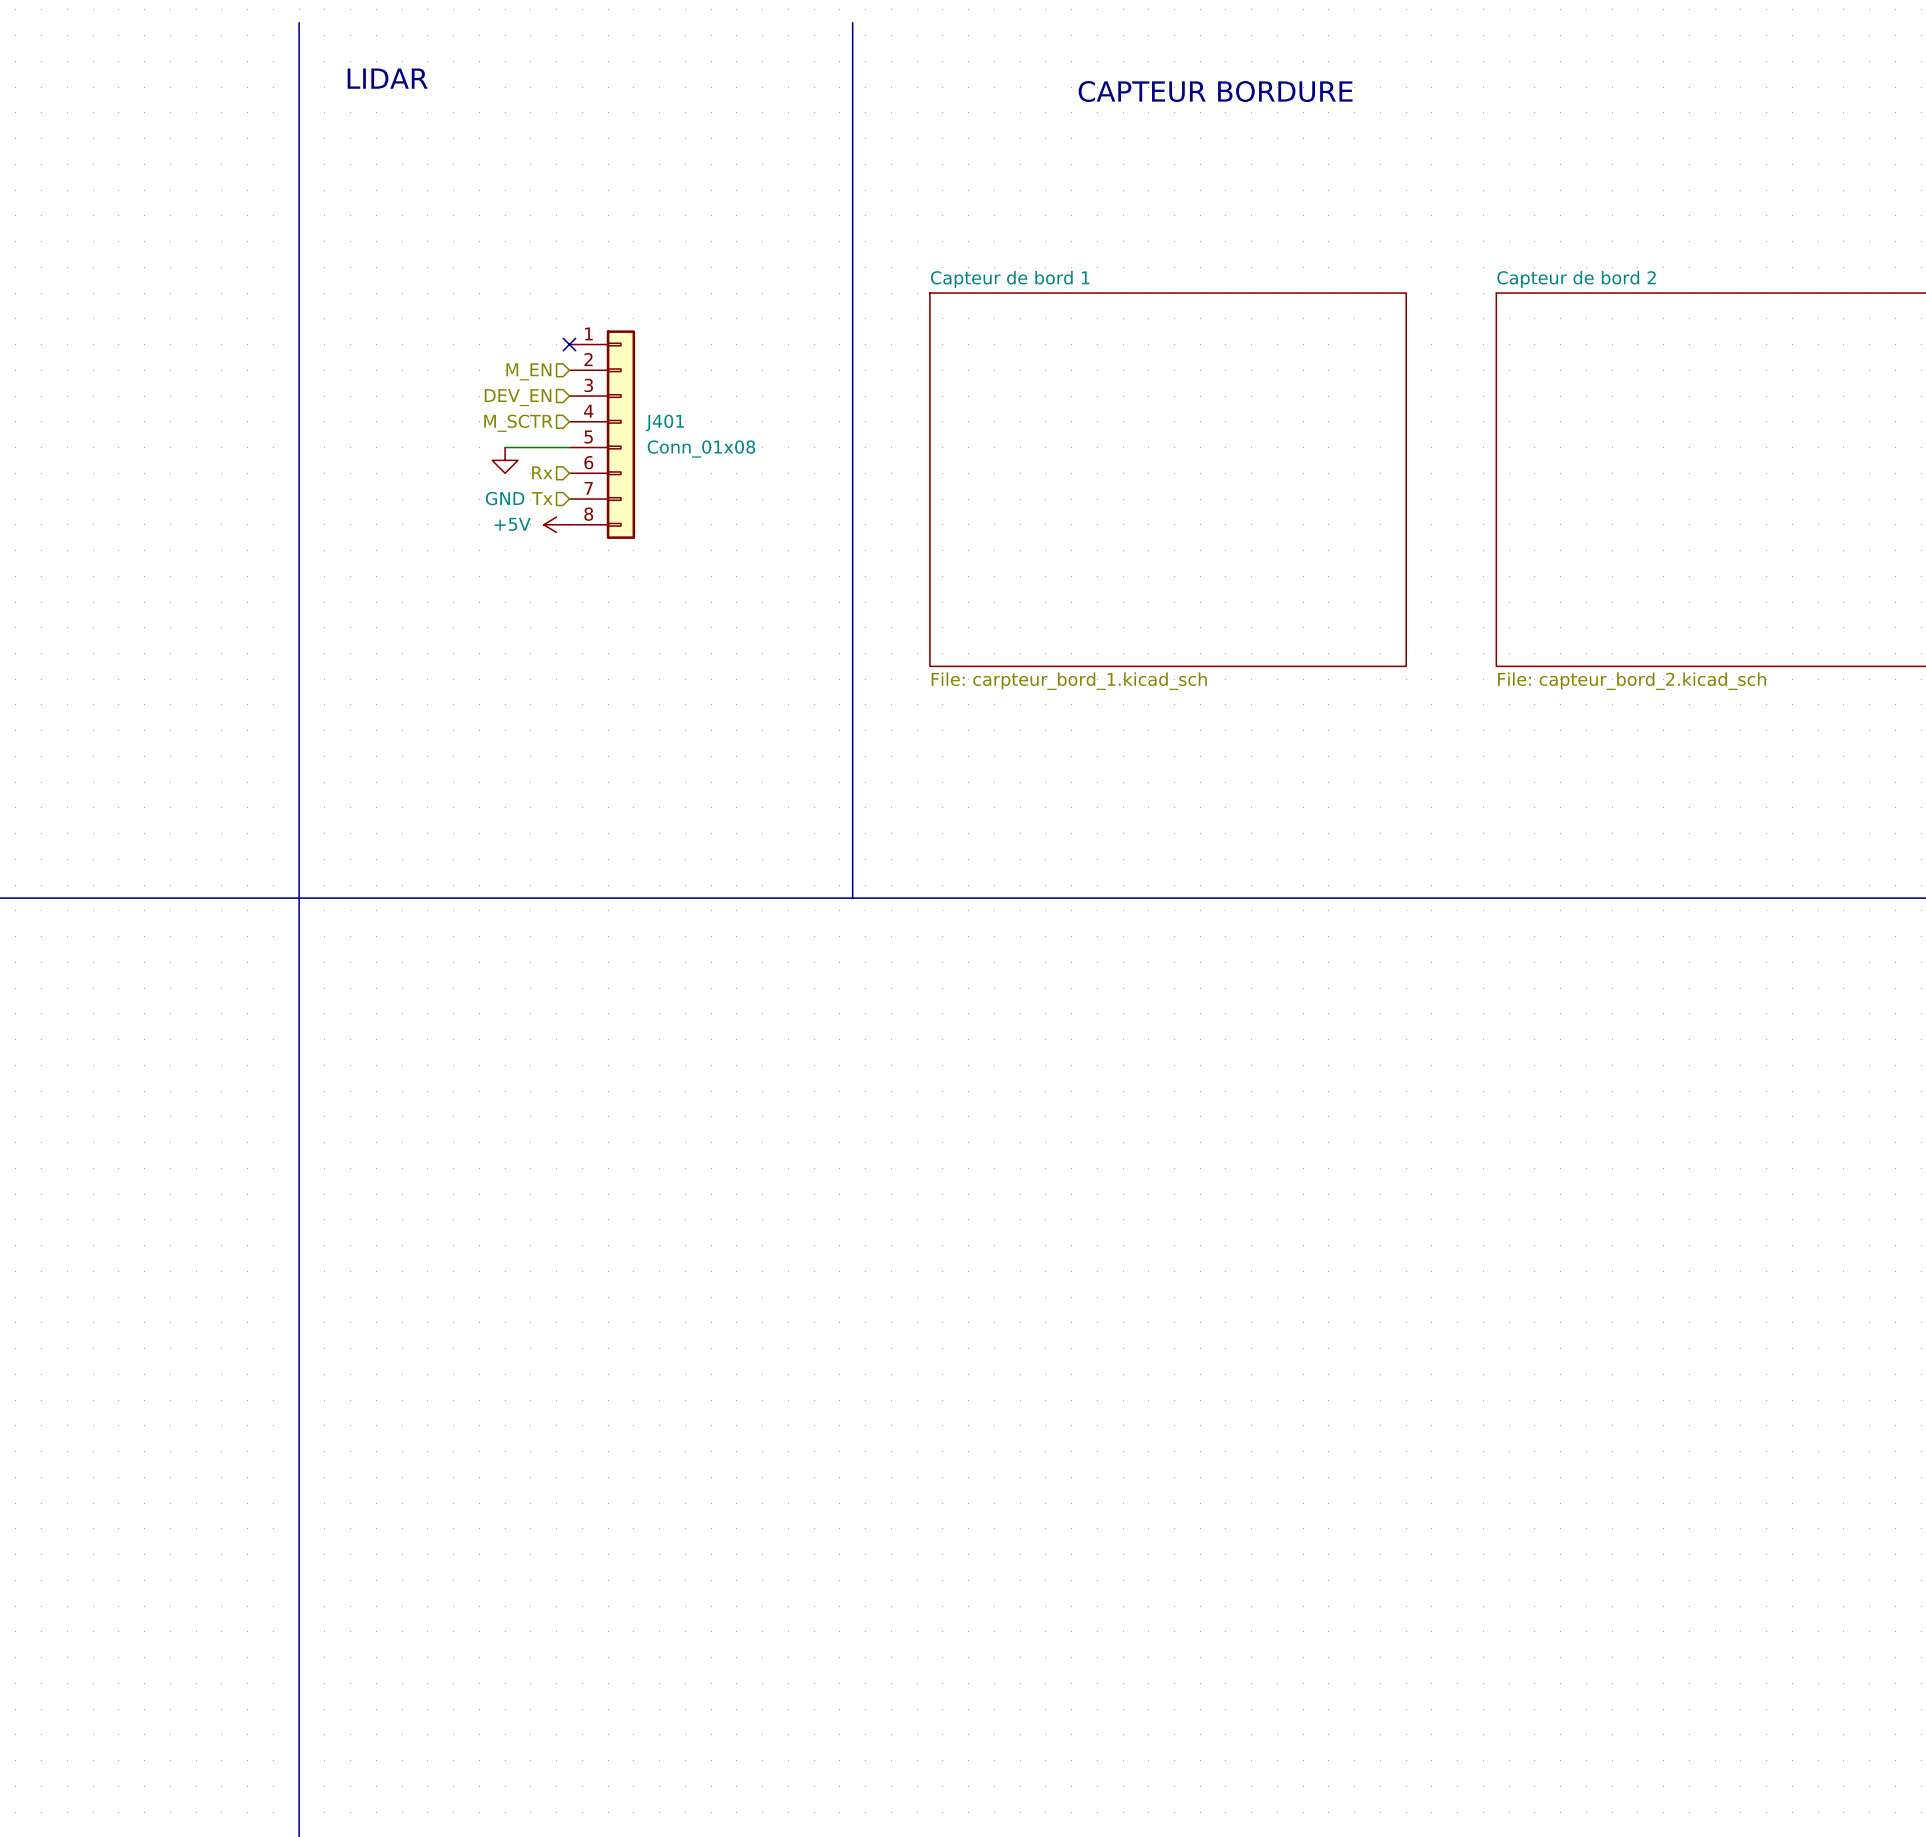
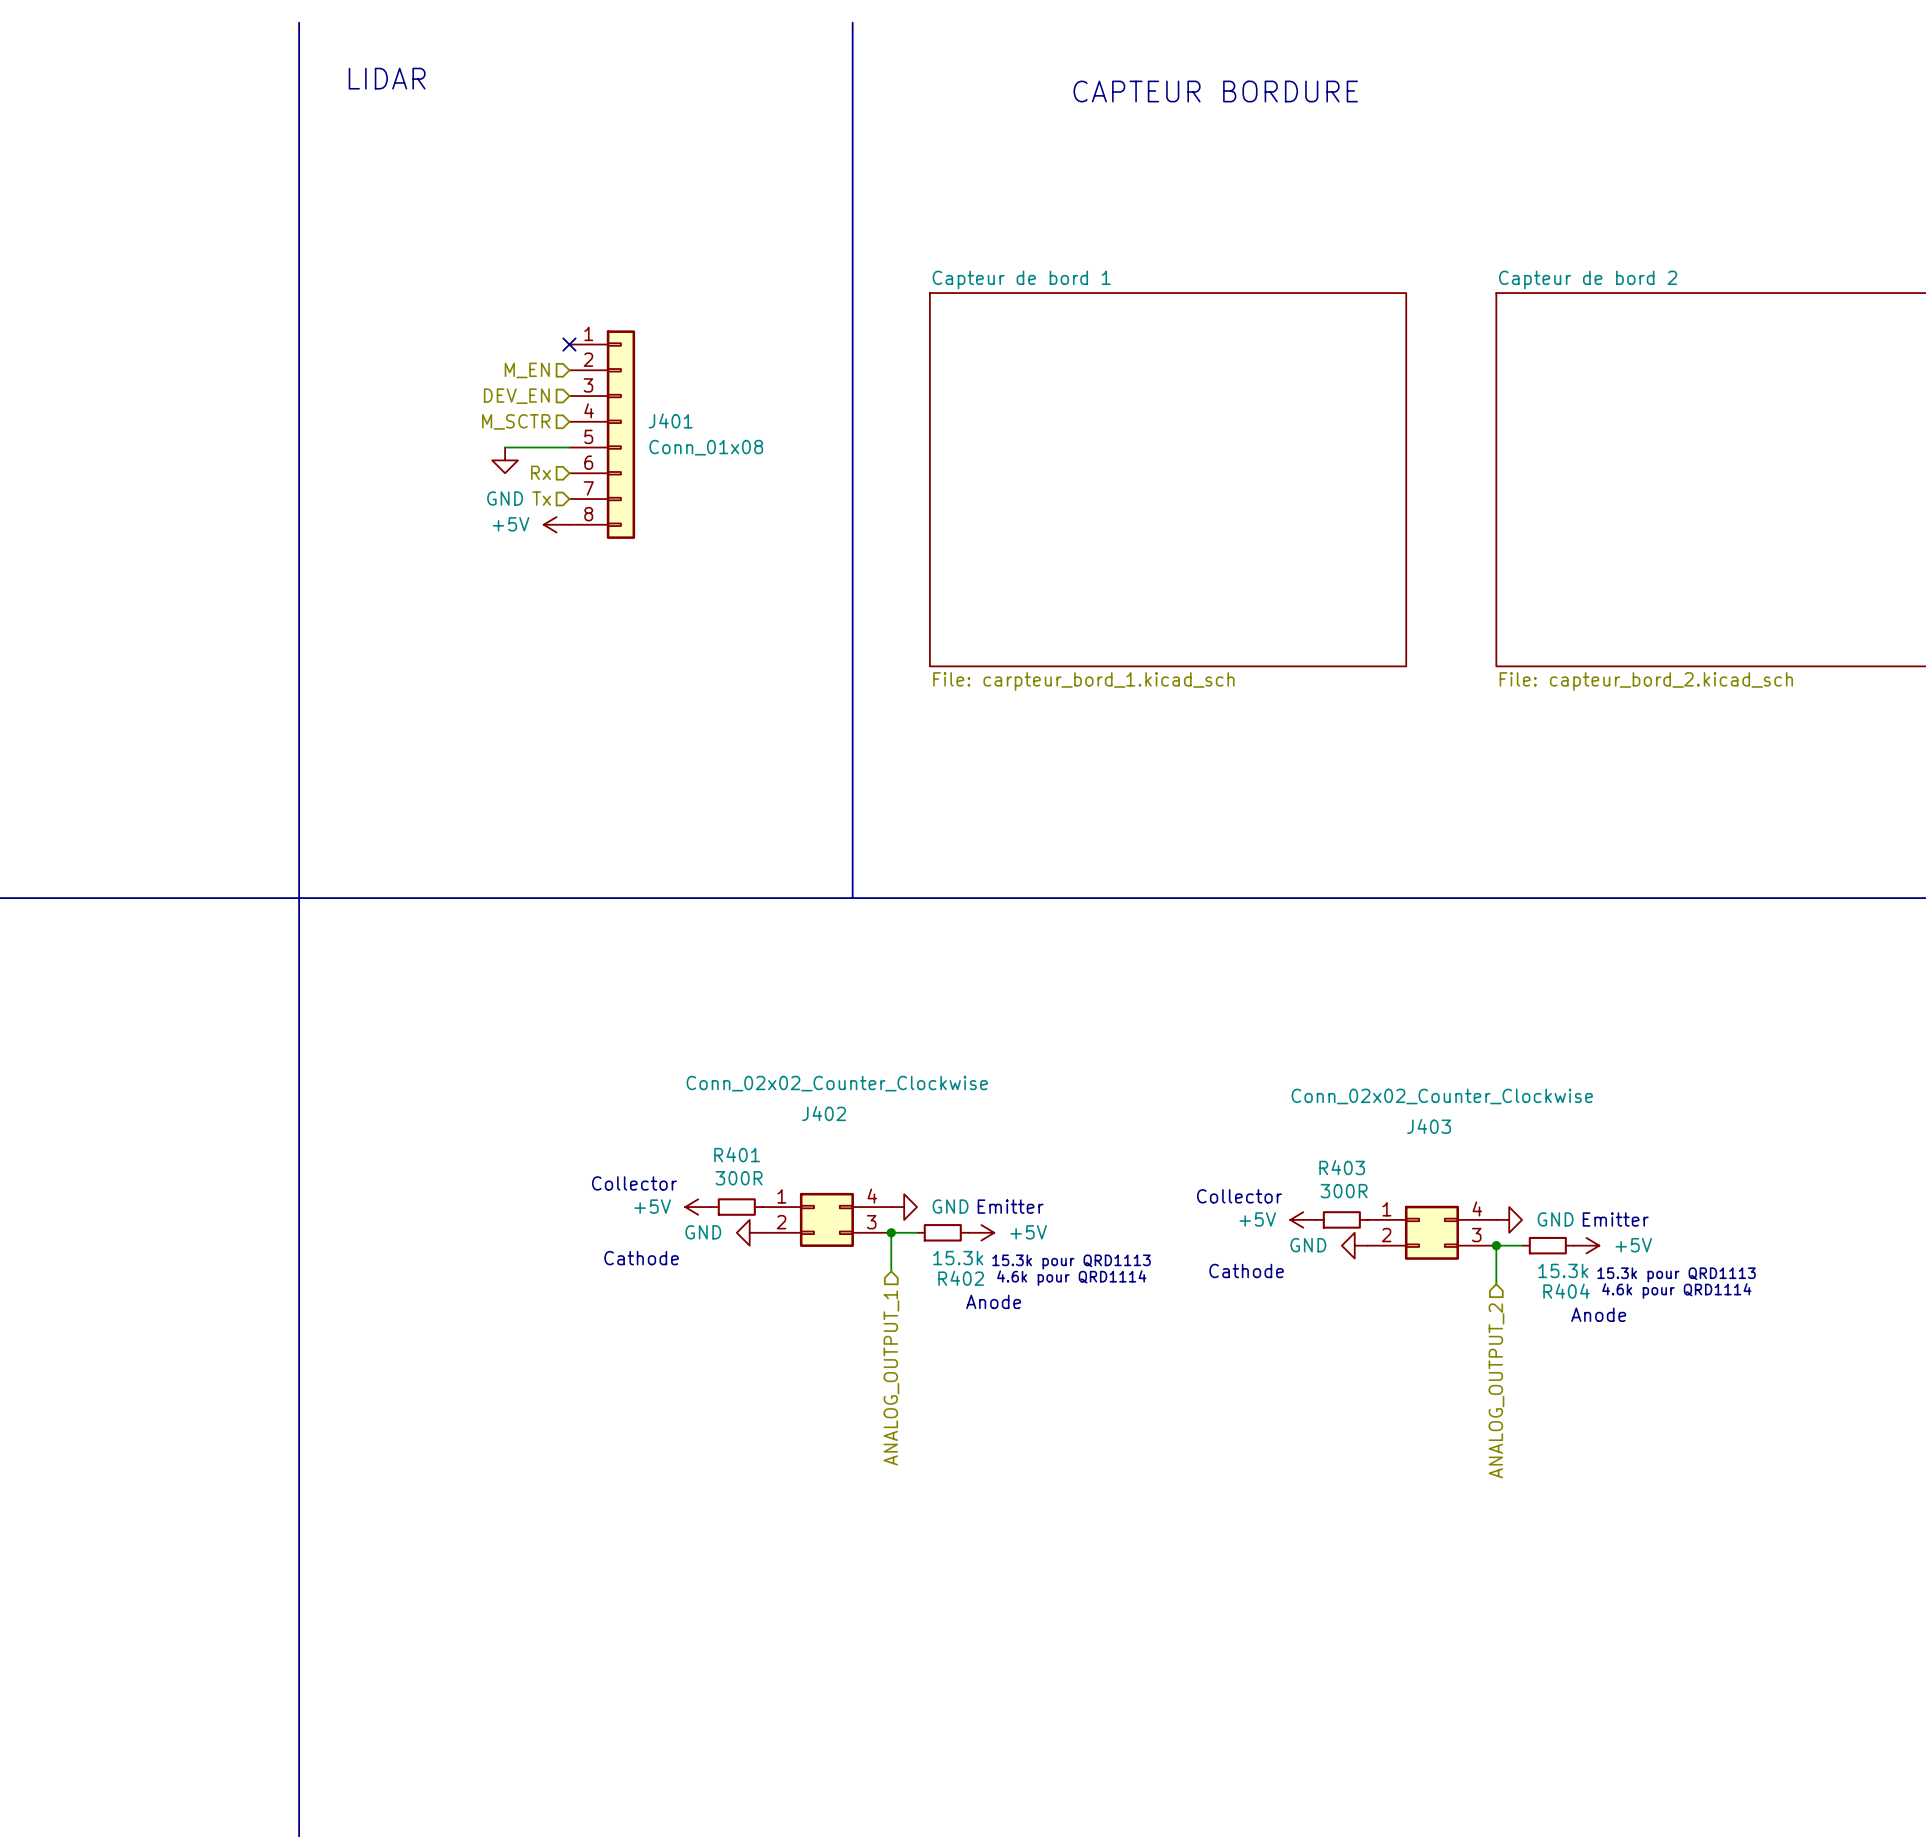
text: none -> Collector (634, 1183)
text: none -> Collector (1239, 1196)
text: none -> Emitter (1010, 1206)
power symbol: none -> +5V (698, 1207)
R401: none -> 300R (736, 1207)
power symbol: none -> GND (904, 1207)
J402: none -> Conn_02x02_Counter_Clockwise (826, 1219)
power symbol: none -> +5V (1303, 1219)
R403: none -> 300R (1341, 1219)
power symbol: none -> GND (1509, 1219)
text: none -> Emitter (1615, 1219)
power symbol: none -> GND (749, 1232)
junction: none -> (891, 1232)
wire: none -> (917, 1232) (891, 1232) (891, 1271)
R402: none -> 15.3k (942, 1232)
power symbol: none -> +5V (981, 1232)
J403: none -> Conn_02x02_Counter_Clockwise (1431, 1232)
power symbol: none -> GND (1354, 1245)
junction: none -> (1496, 1245)
wire: none -> (1522, 1245) (1496, 1245) (1496, 1284)
R404: none -> 15.3k (1547, 1245)
power symbol: none -> +5V (1586, 1245)
text: none -> Cathode (641, 1258)
text: none -> 15.3k pour QRD1113 (1071, 1262)
text: none -> Cathode (1246, 1270)
text: none -> 15.3k pour QRD1113 (1676, 1274)
text: none -> 4.6k pour QRD1114 (1071, 1278)
text: none -> 4.6k pour QRD1114 (1676, 1290)
text: none -> Anode (993, 1301)
text: none -> Anode (1598, 1314)
hierarchical label: none -> ANALOG_OUTPUT_1 (891, 1377)
hierarchical label: none -> ANALOG_OUTPUT_2 (1496, 1390)

